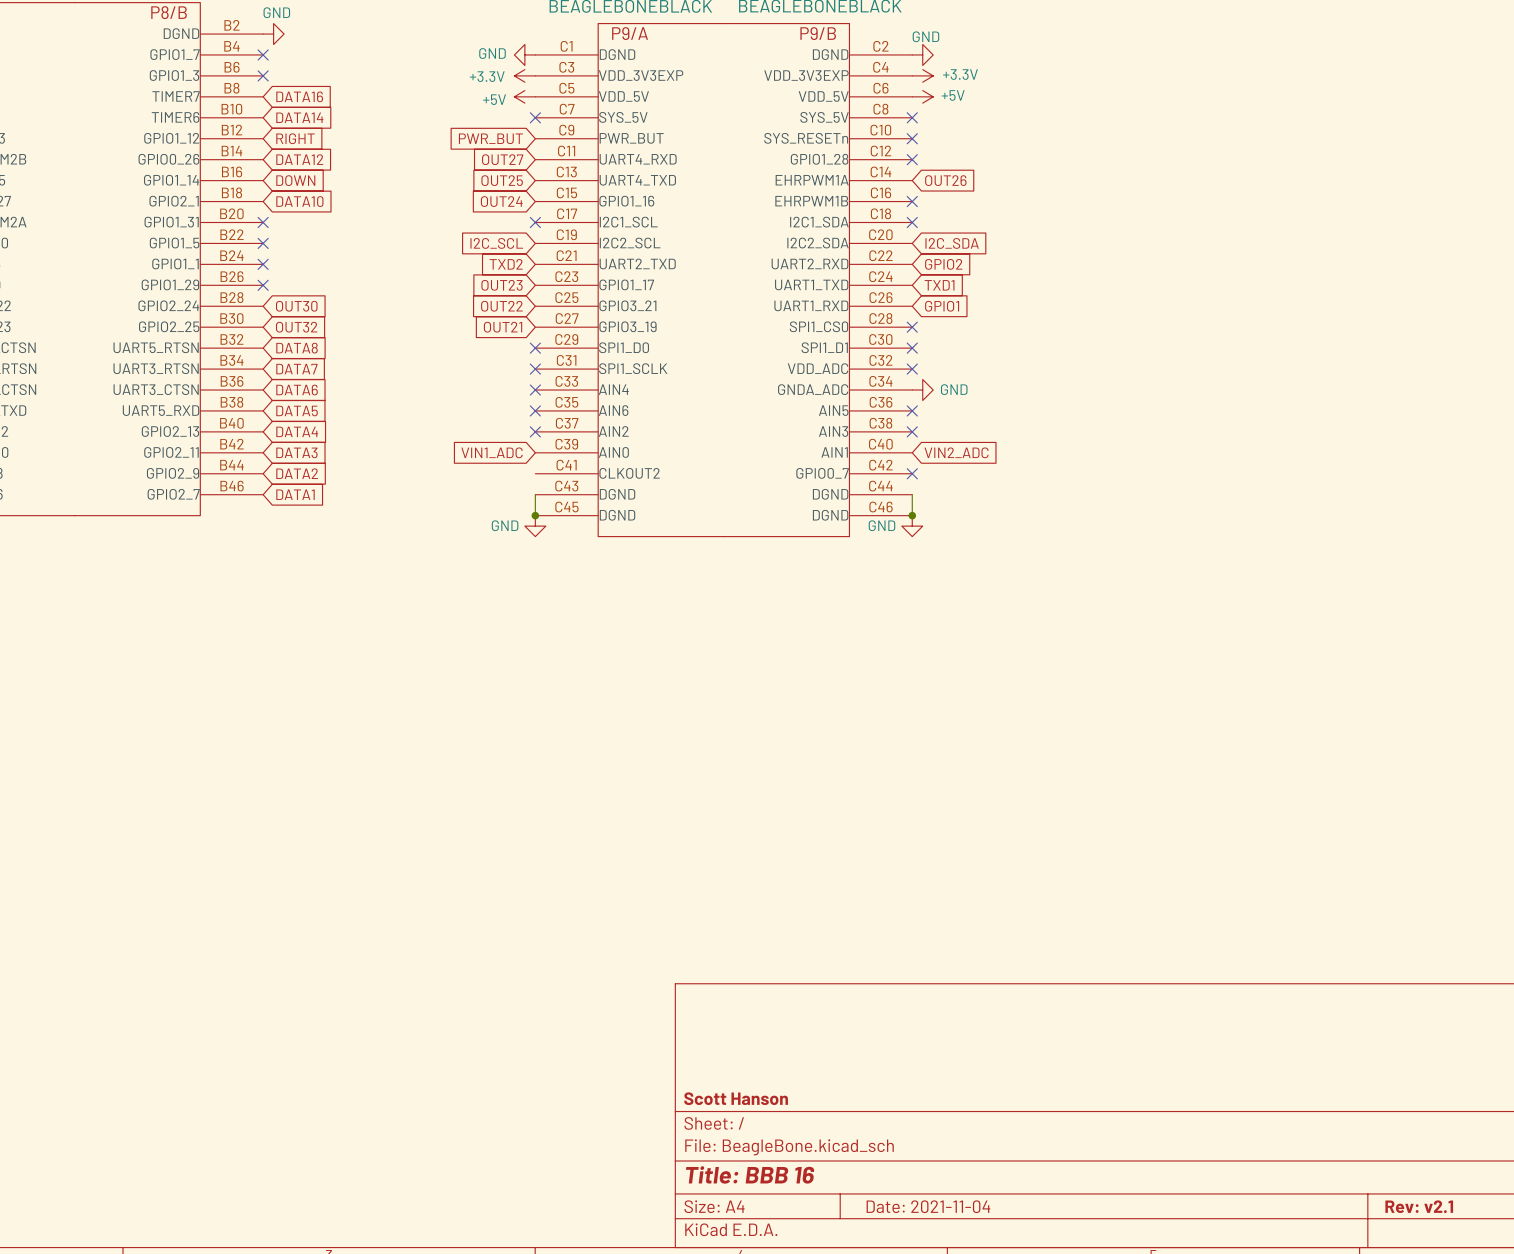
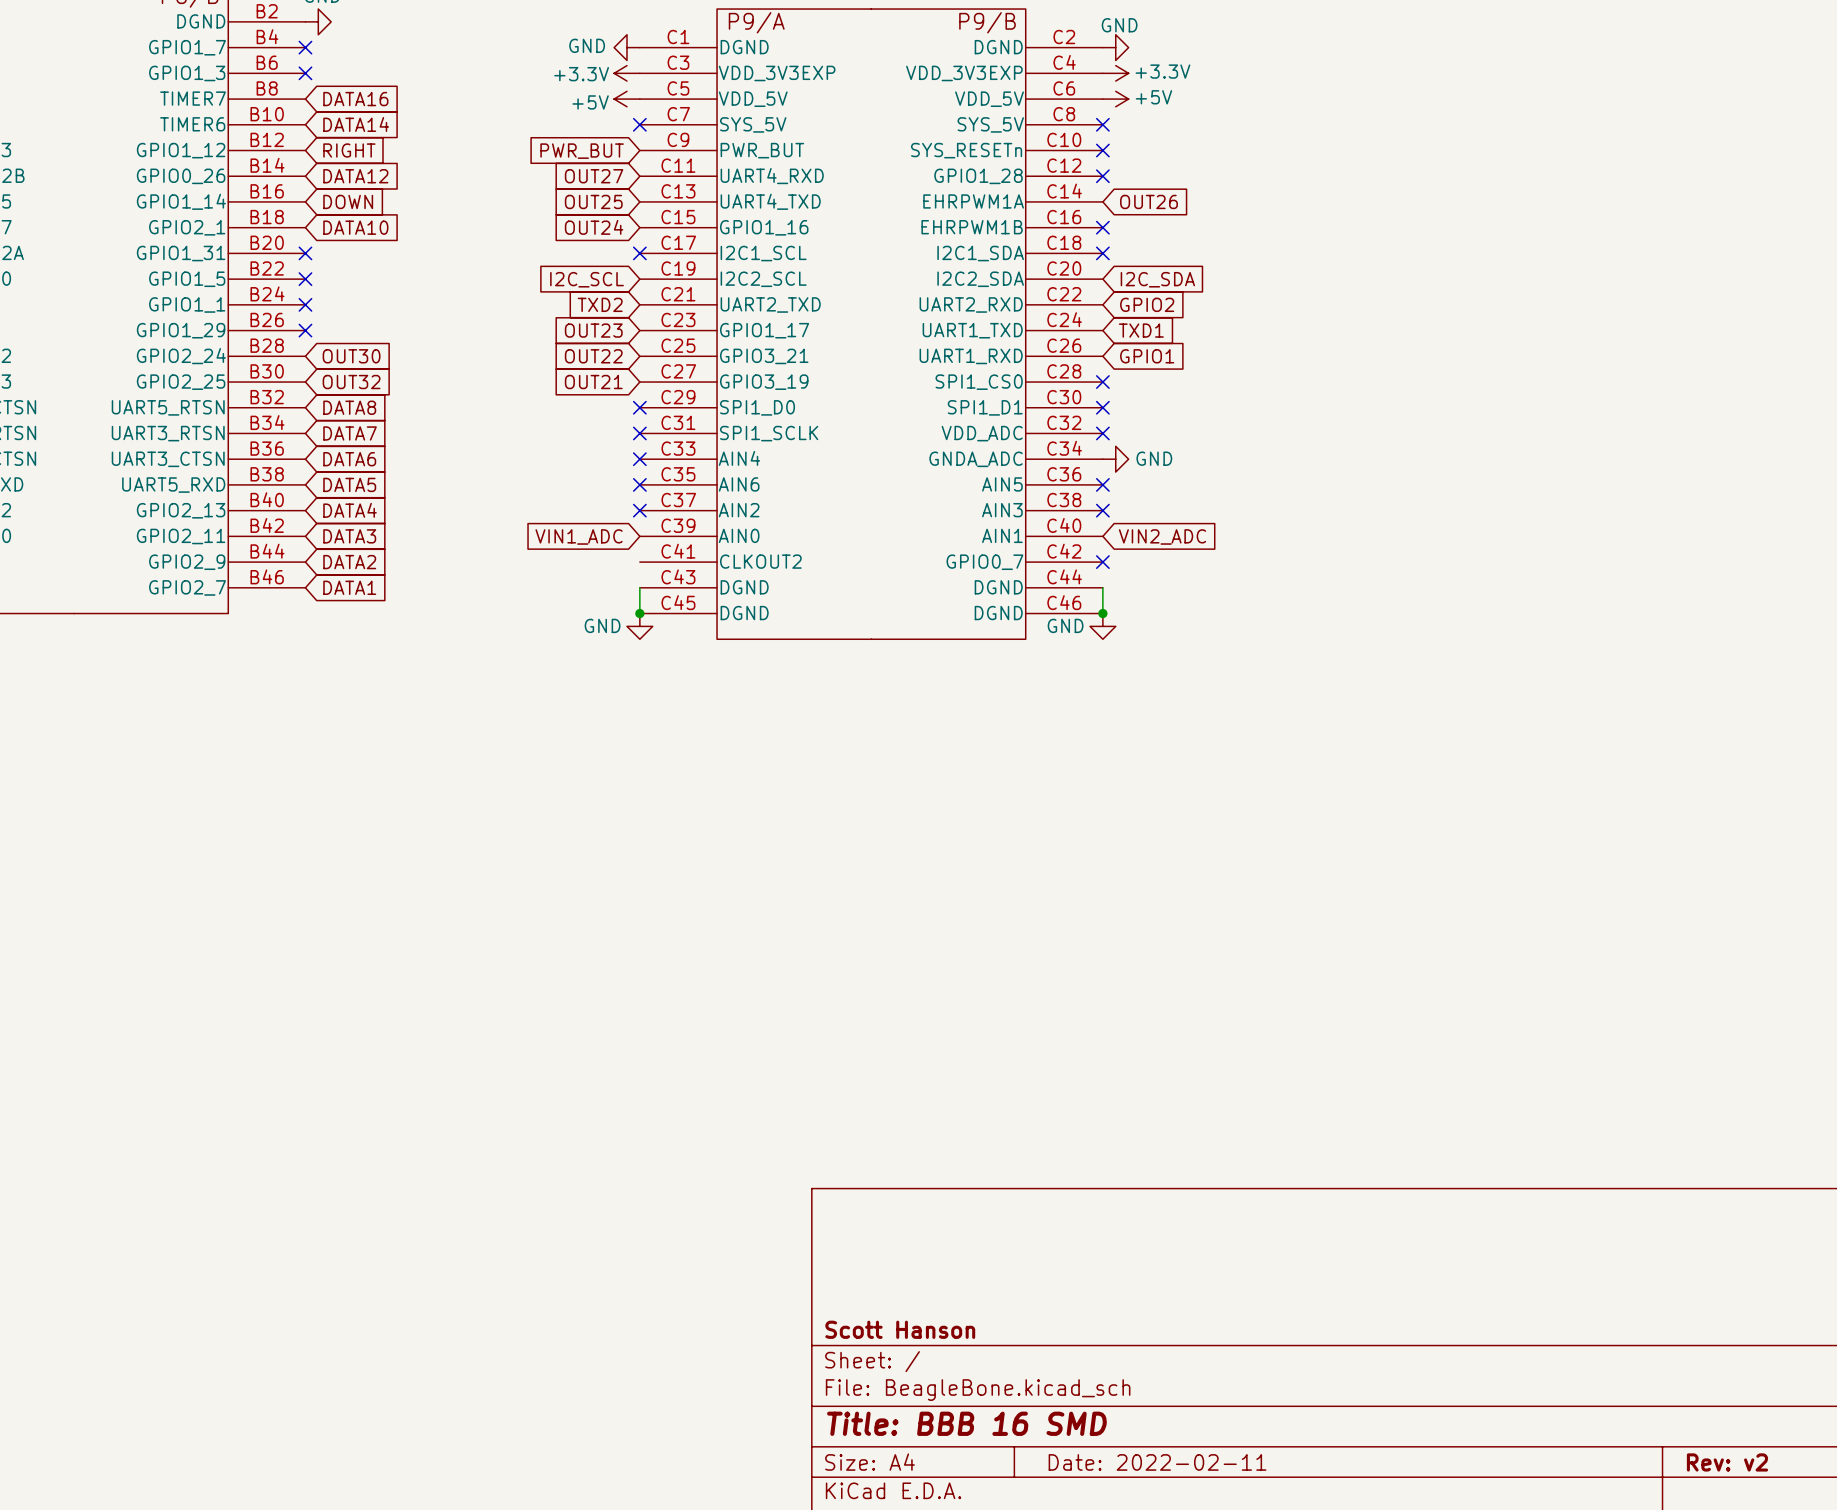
title block: Title: BBB 16 (750, 1174) -> Title: BBB 16 SMD (966, 1423)
title block: Date: 2021-11-04 (928, 1206) -> Date: 2022-02-11 (1157, 1462)
title block: Rev: v2.1 (1419, 1206) -> Rev: v2 (1727, 1462)

